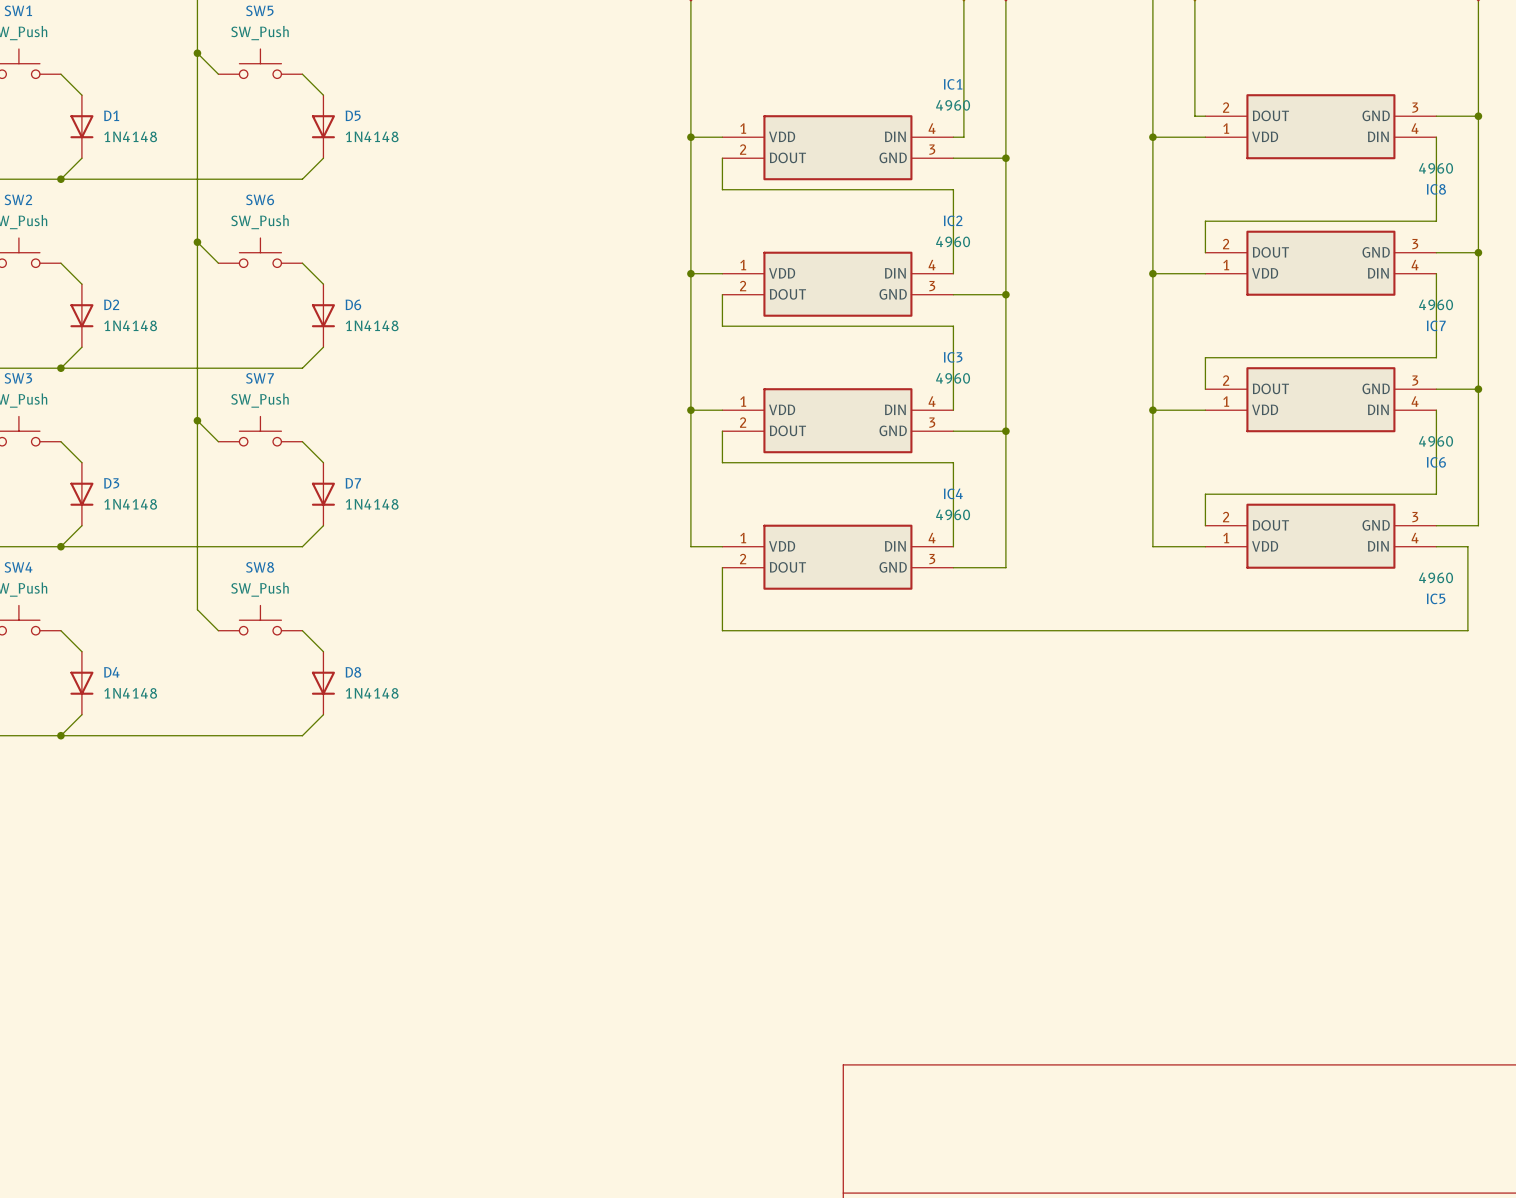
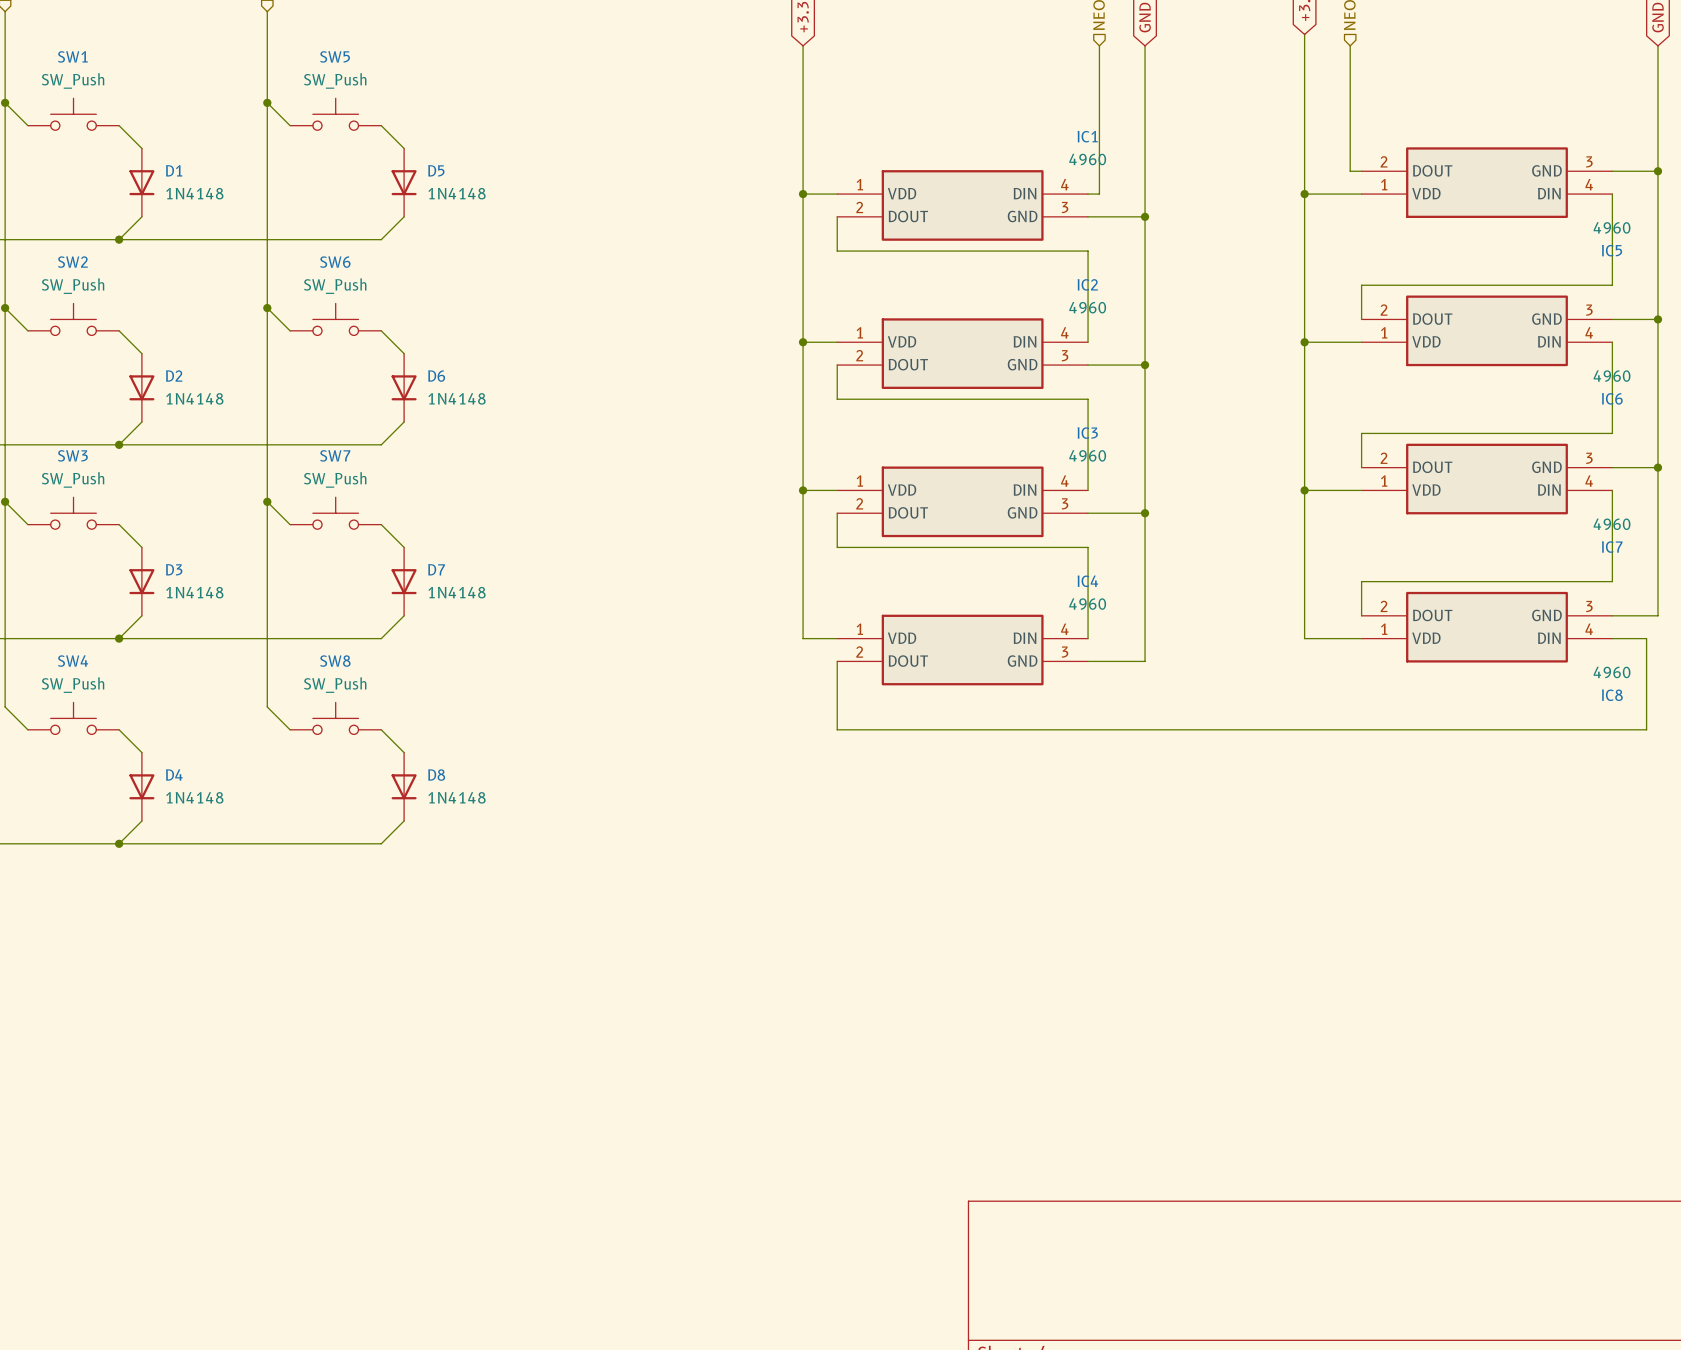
IC8 name: IC8 (1436, 189) -> IC5 (1612, 250)
IC7 name: IC7 (1436, 325) -> IC6 (1612, 398)
IC6 name: IC6 (1436, 462) -> IC7 (1612, 547)
IC5 name: IC5 (1436, 598) -> IC8 (1612, 695)

